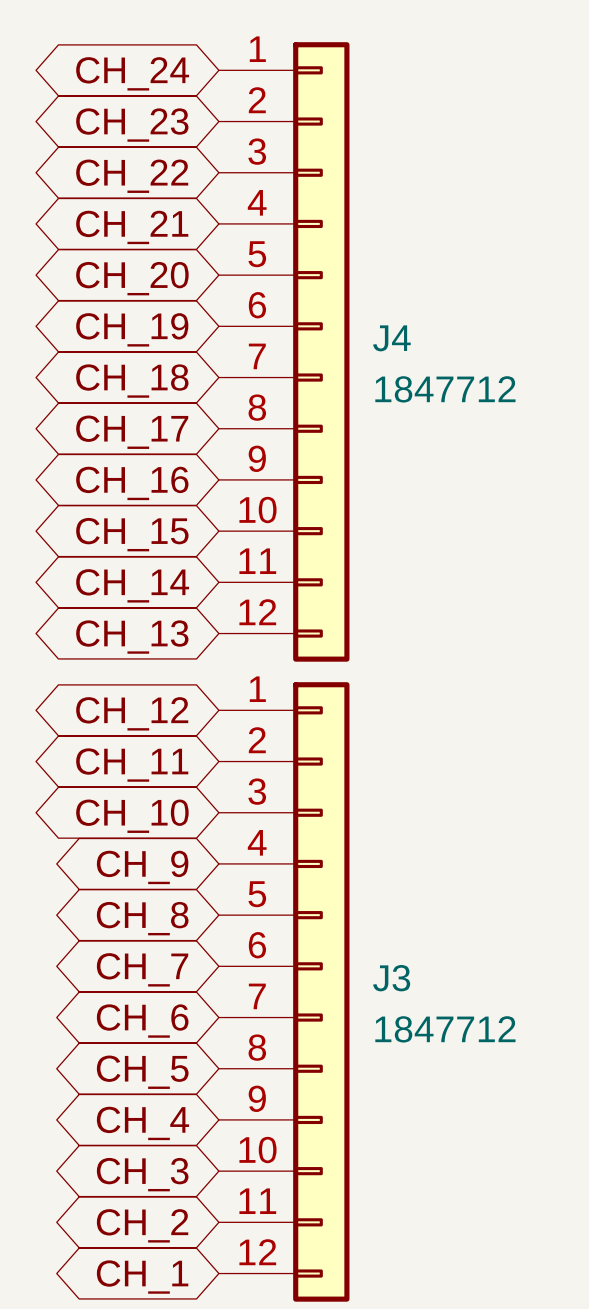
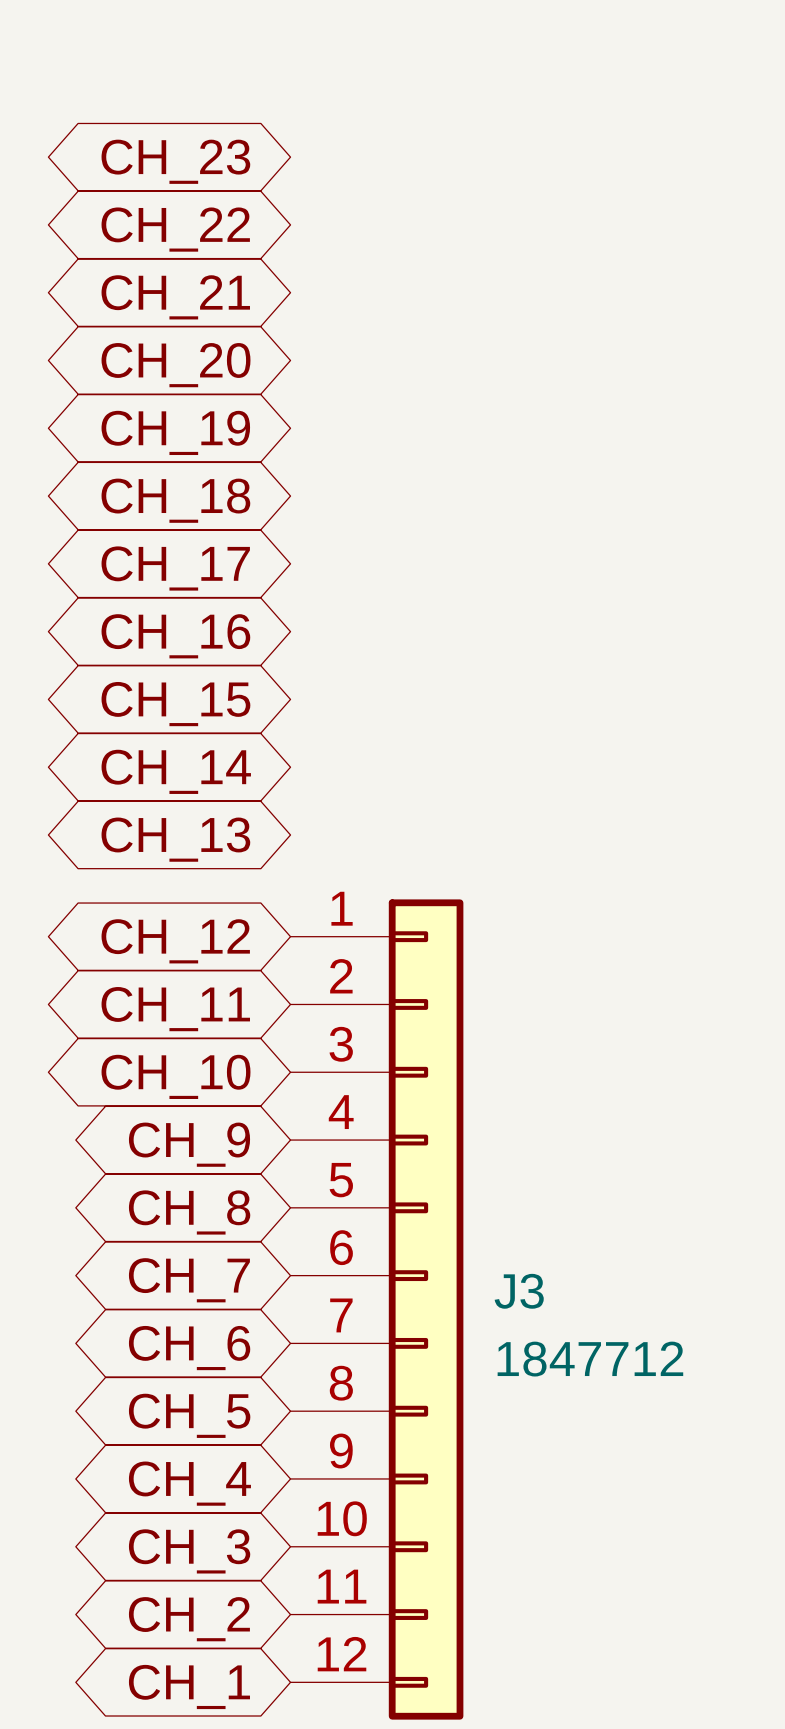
global label: CH_24 (132, 73) -> none
J4: 1847712 (284, 351) -> none

